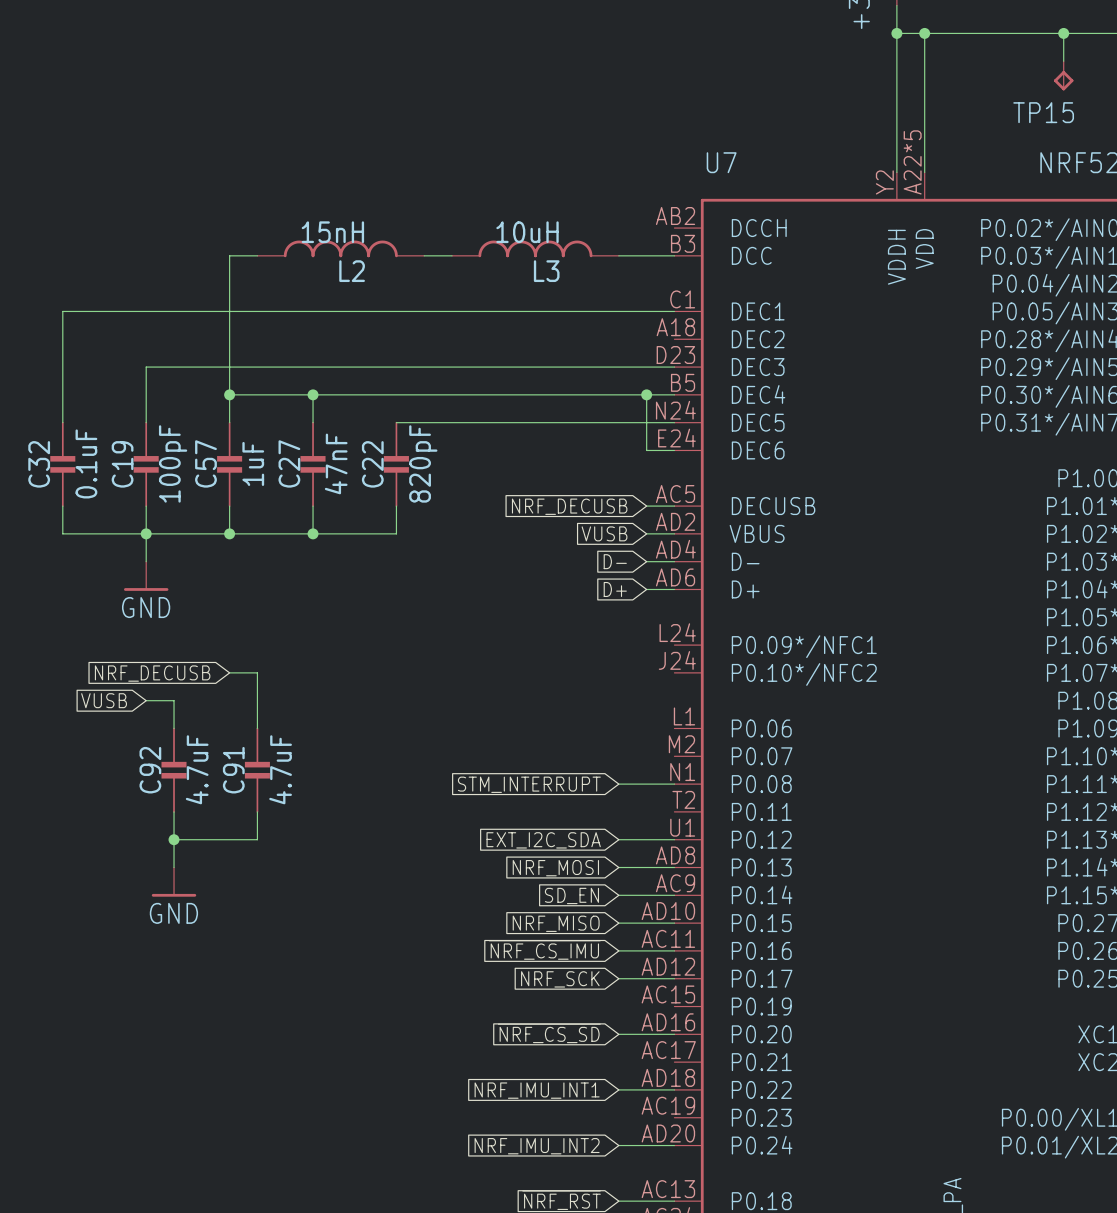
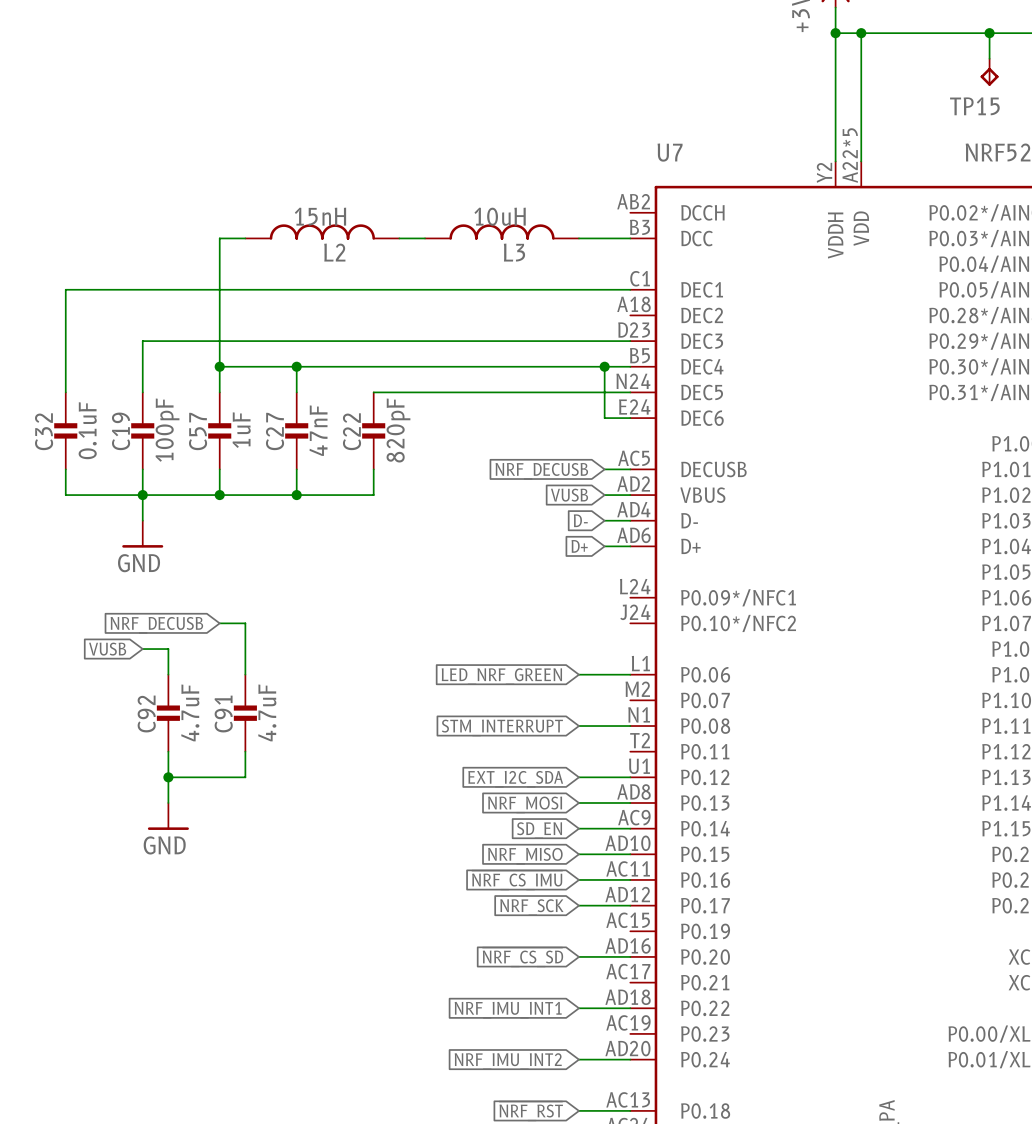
wire: none -> (578, 674) (630, 674)
global label: none -> LED_NRF_GREEN (501, 676)

